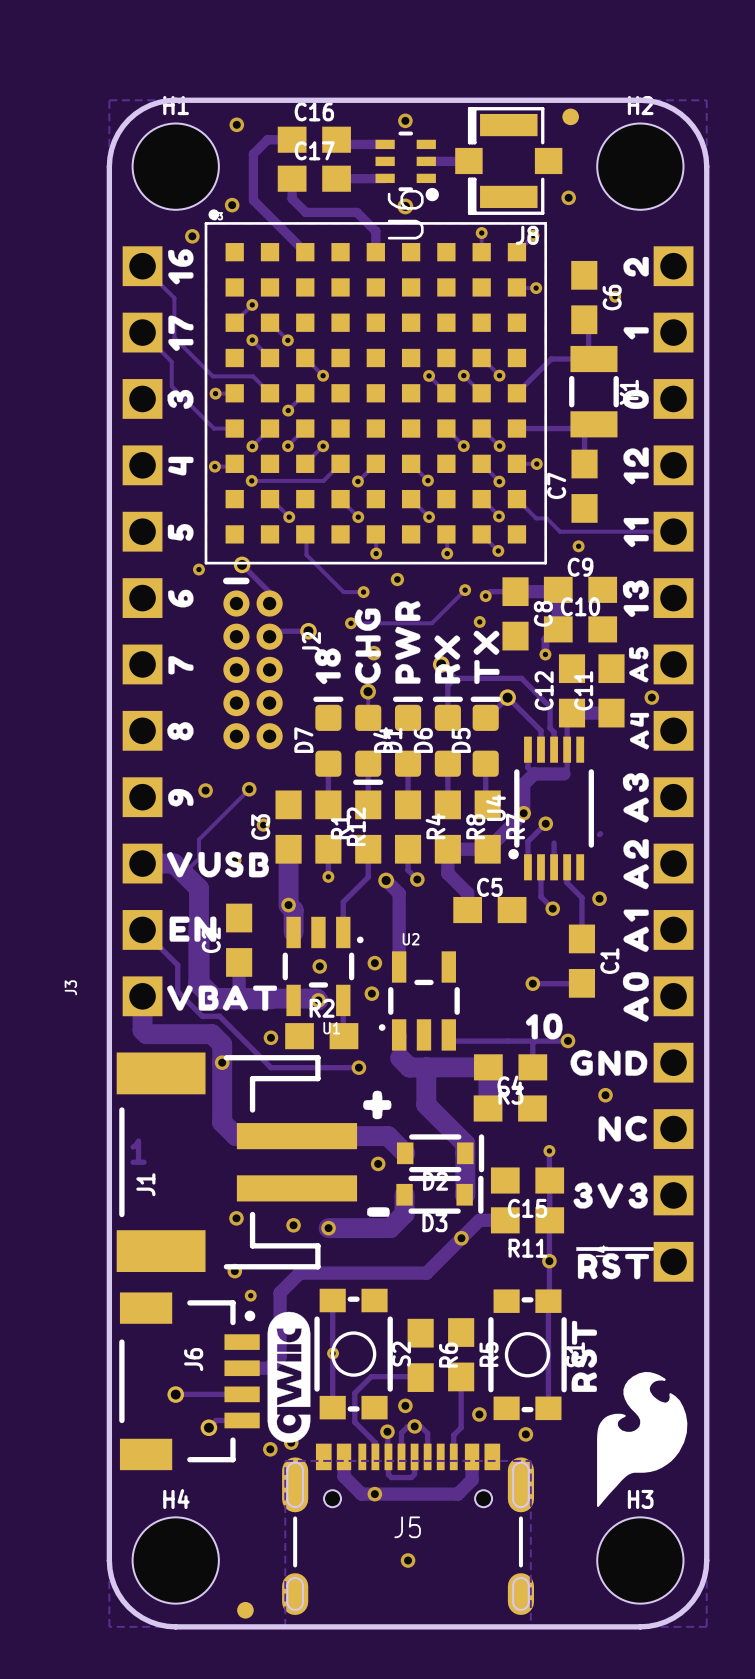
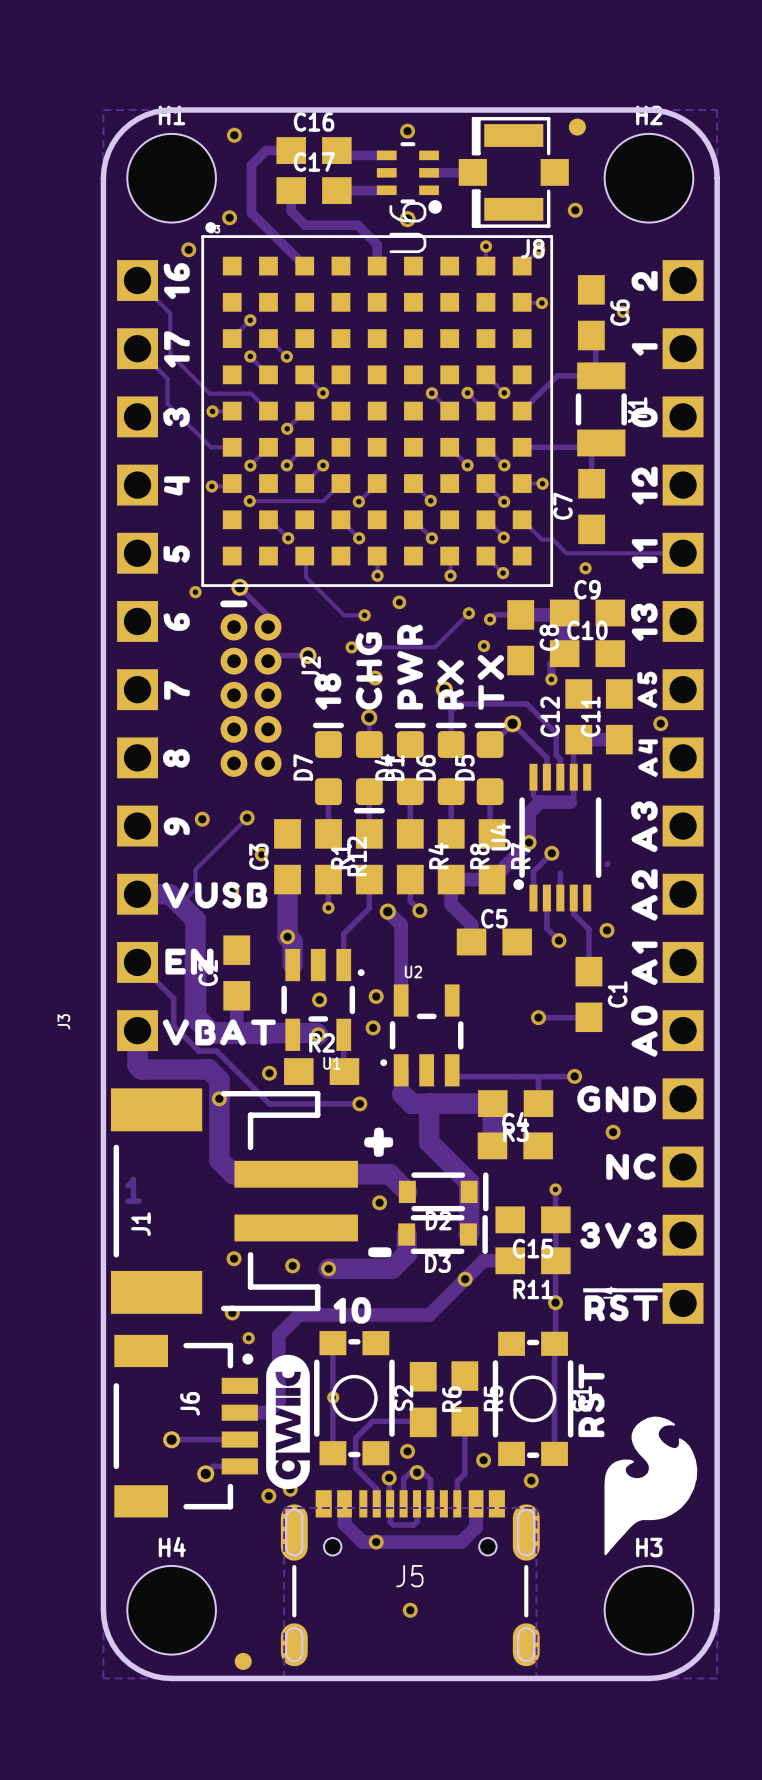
drawing position: (544, 1026) -> (352, 1310)

